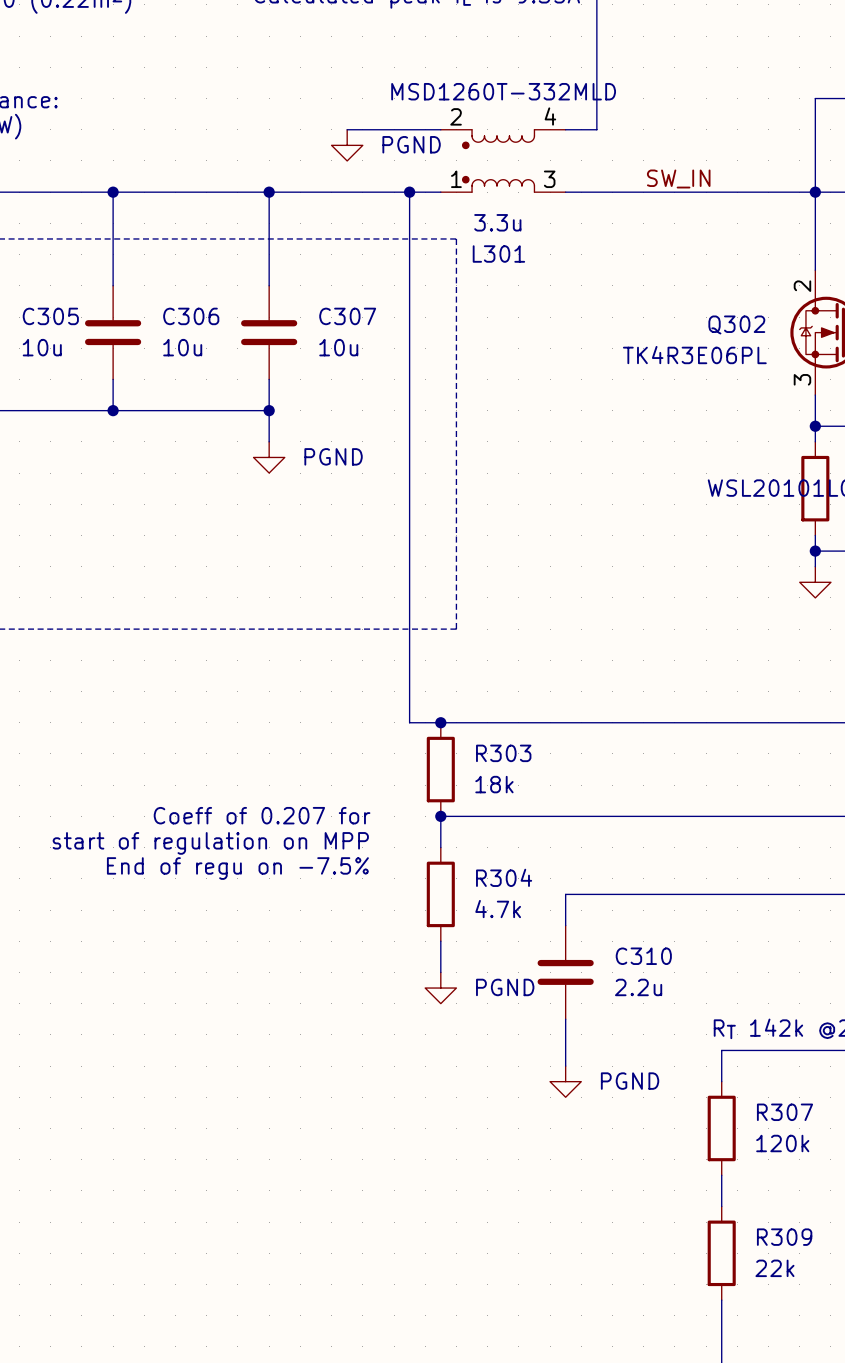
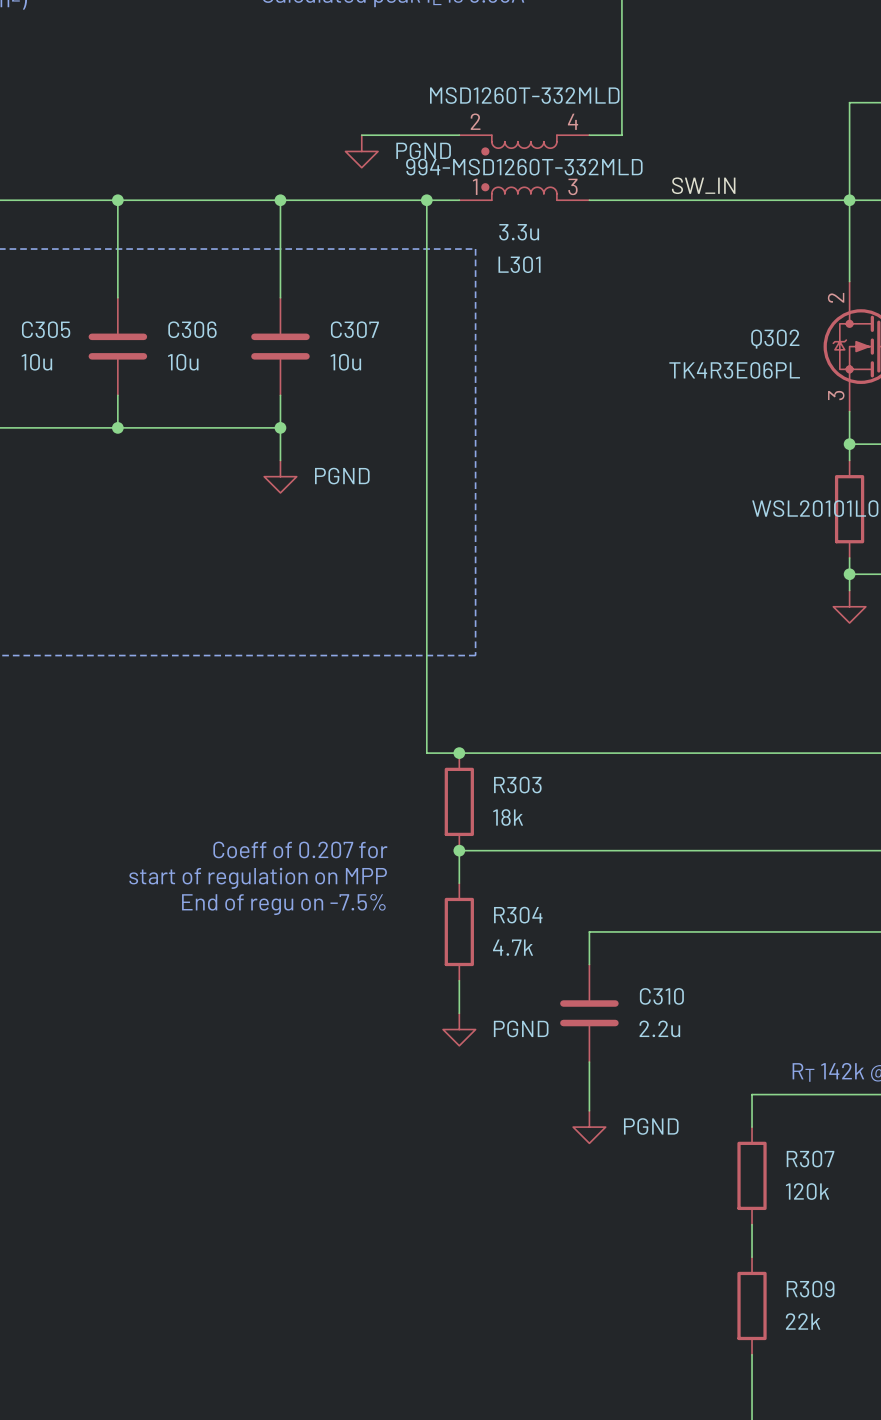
L301 text: none -> 994-MSD1260T-332MLD (524, 167)

